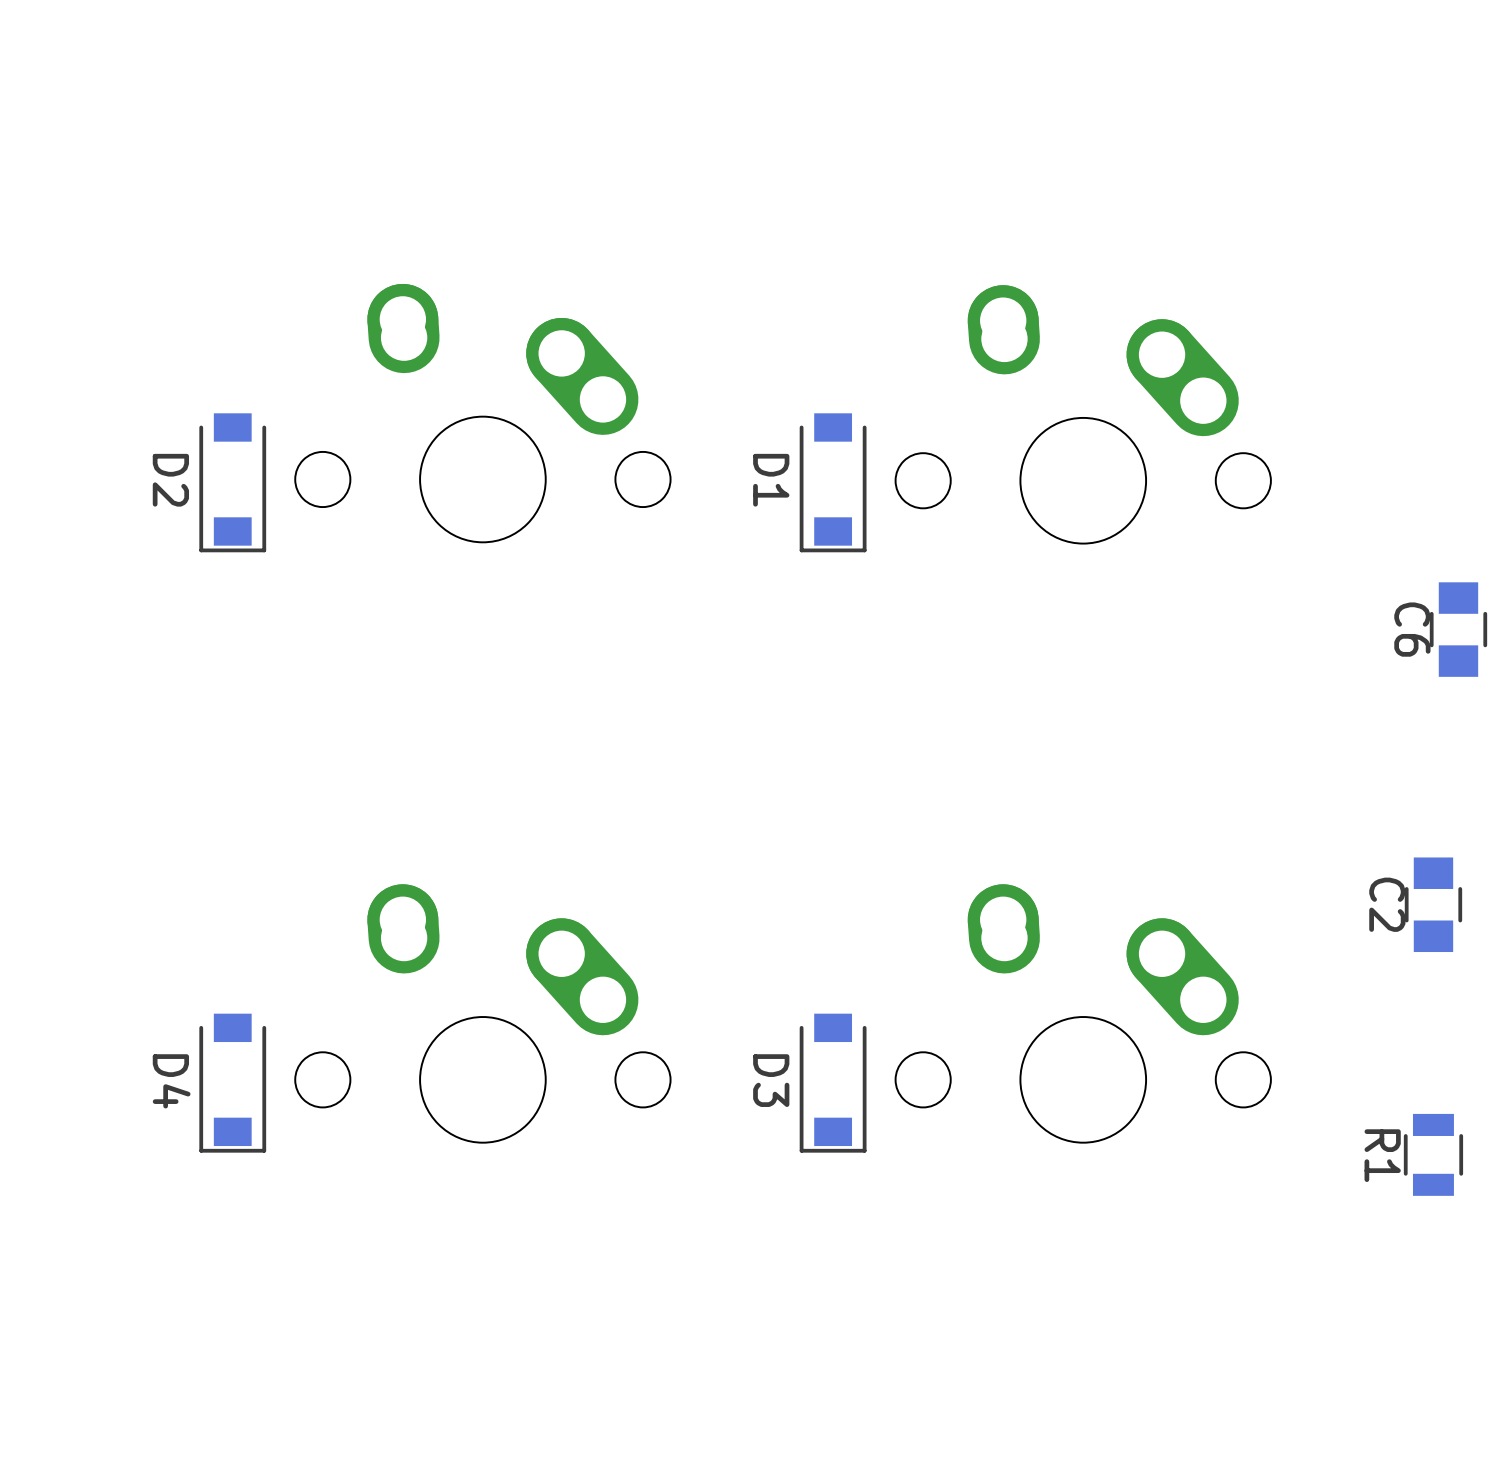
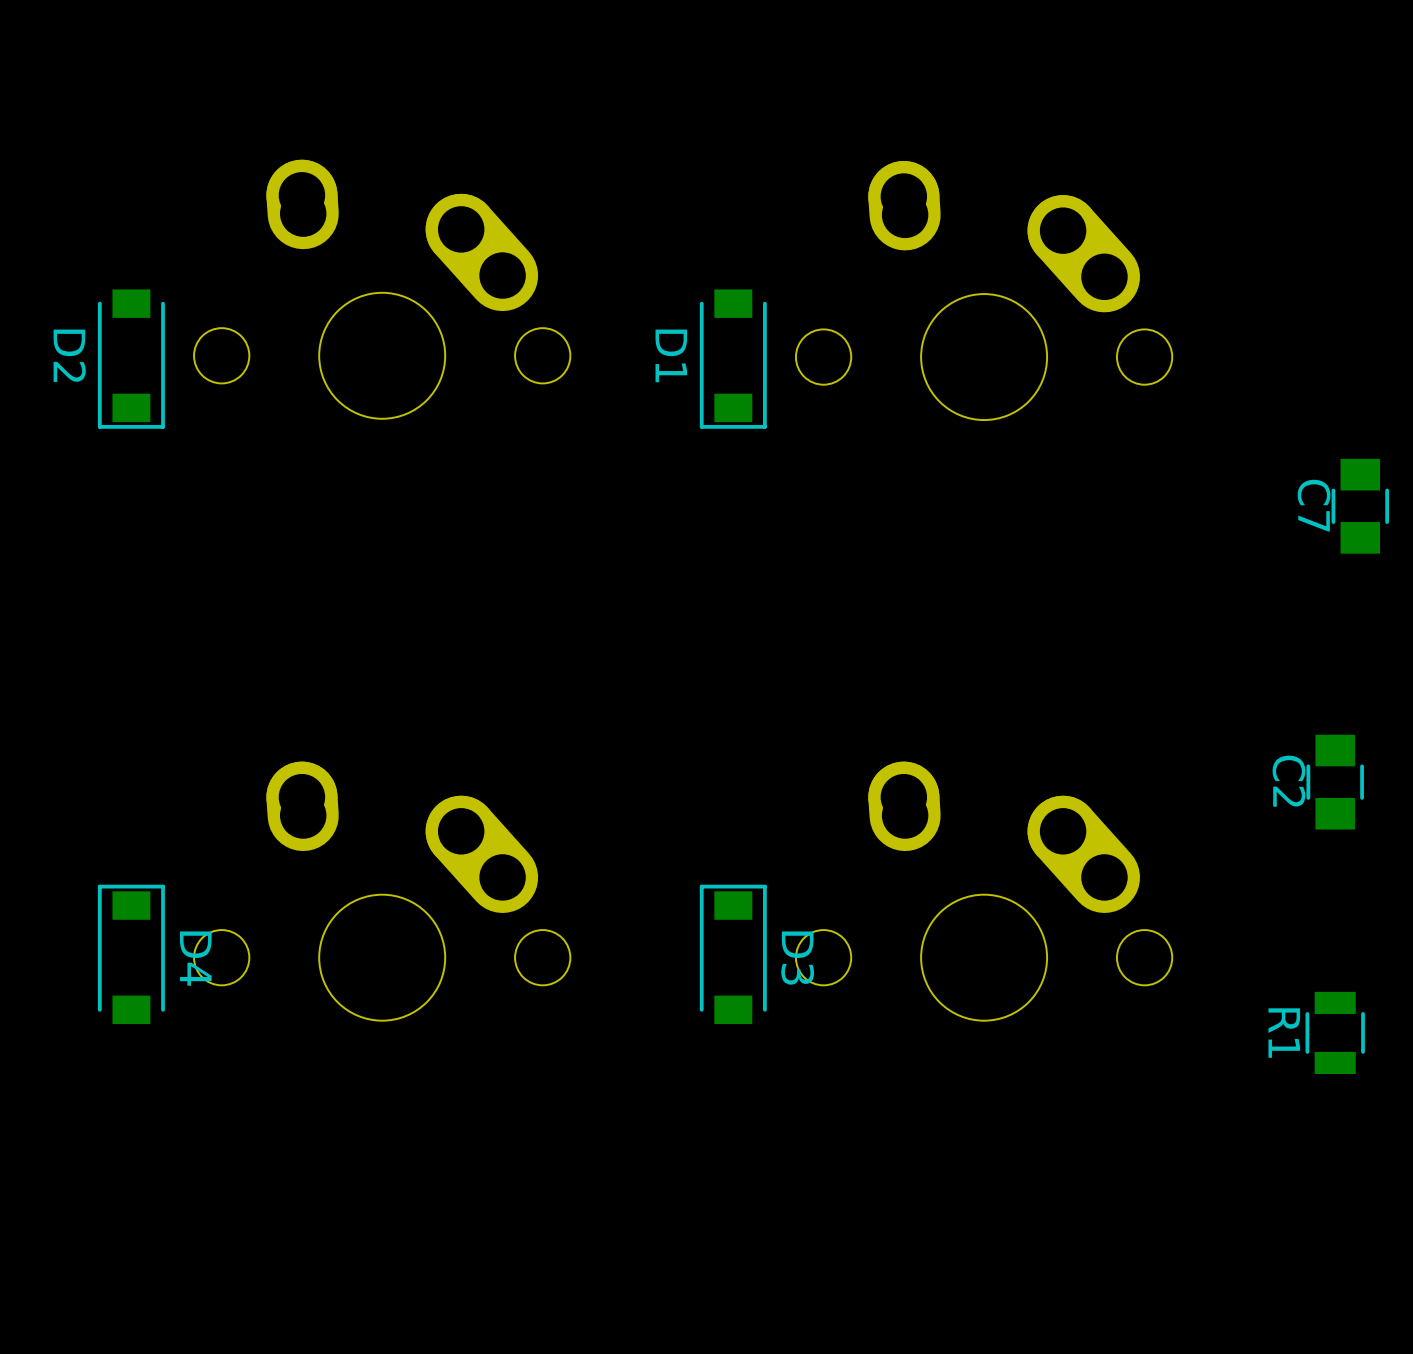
C6 name: C6 (1412, 629) -> C7 (1314, 505)
D4 rotation: 0° (232, 1083) -> 180° (131, 954)
D3 rotation: 0° (833, 1083) -> 180° (733, 954)

